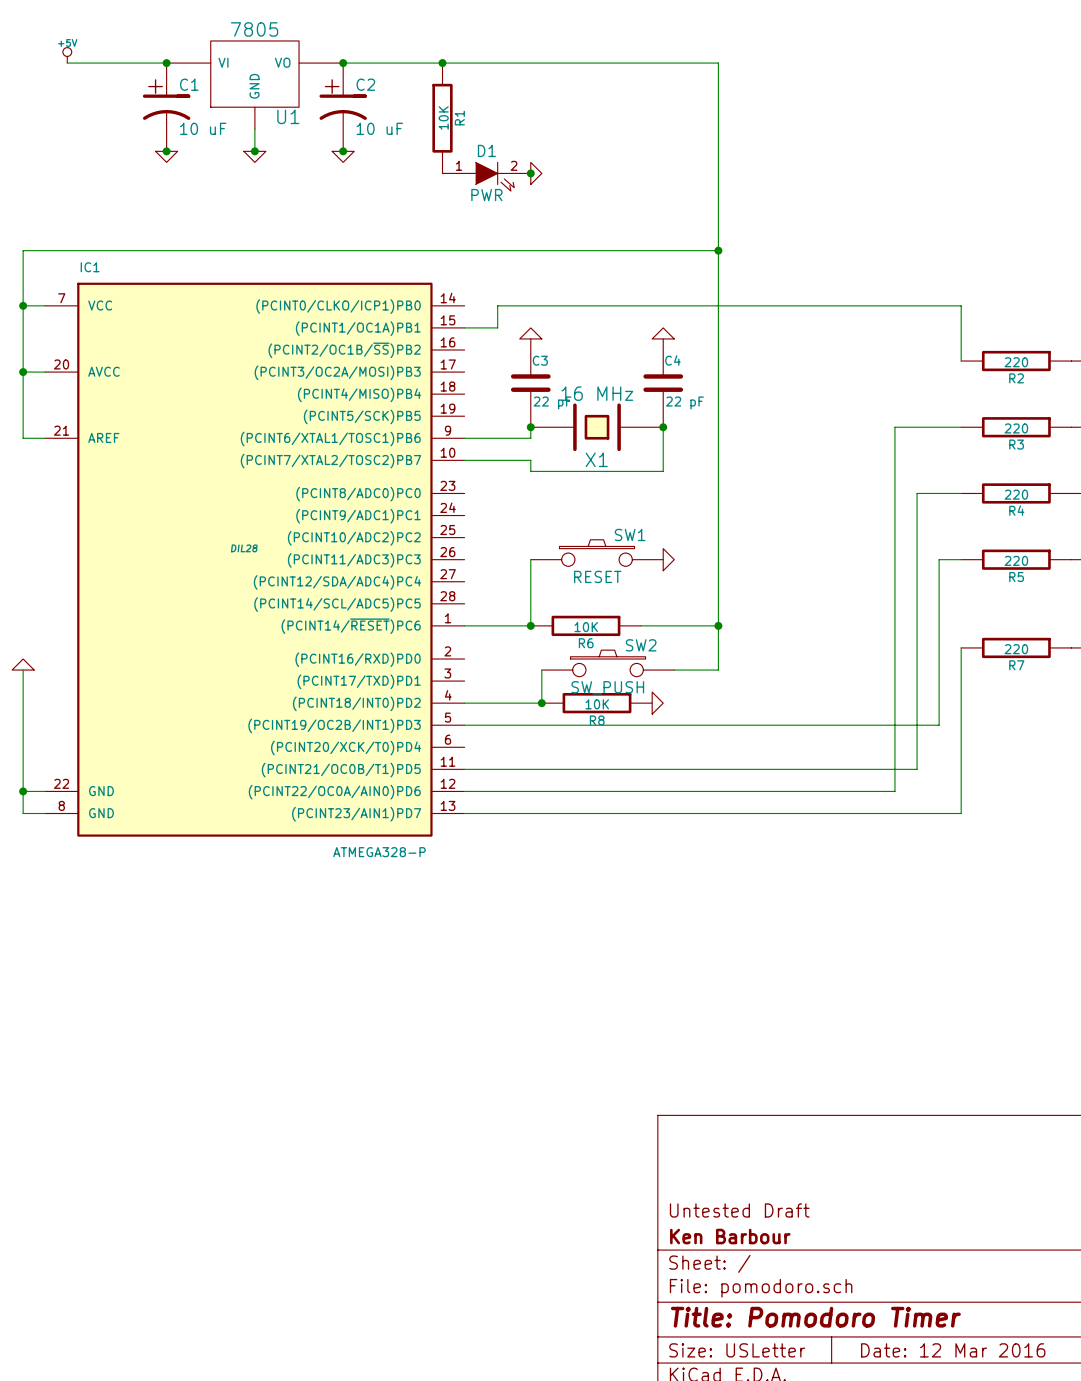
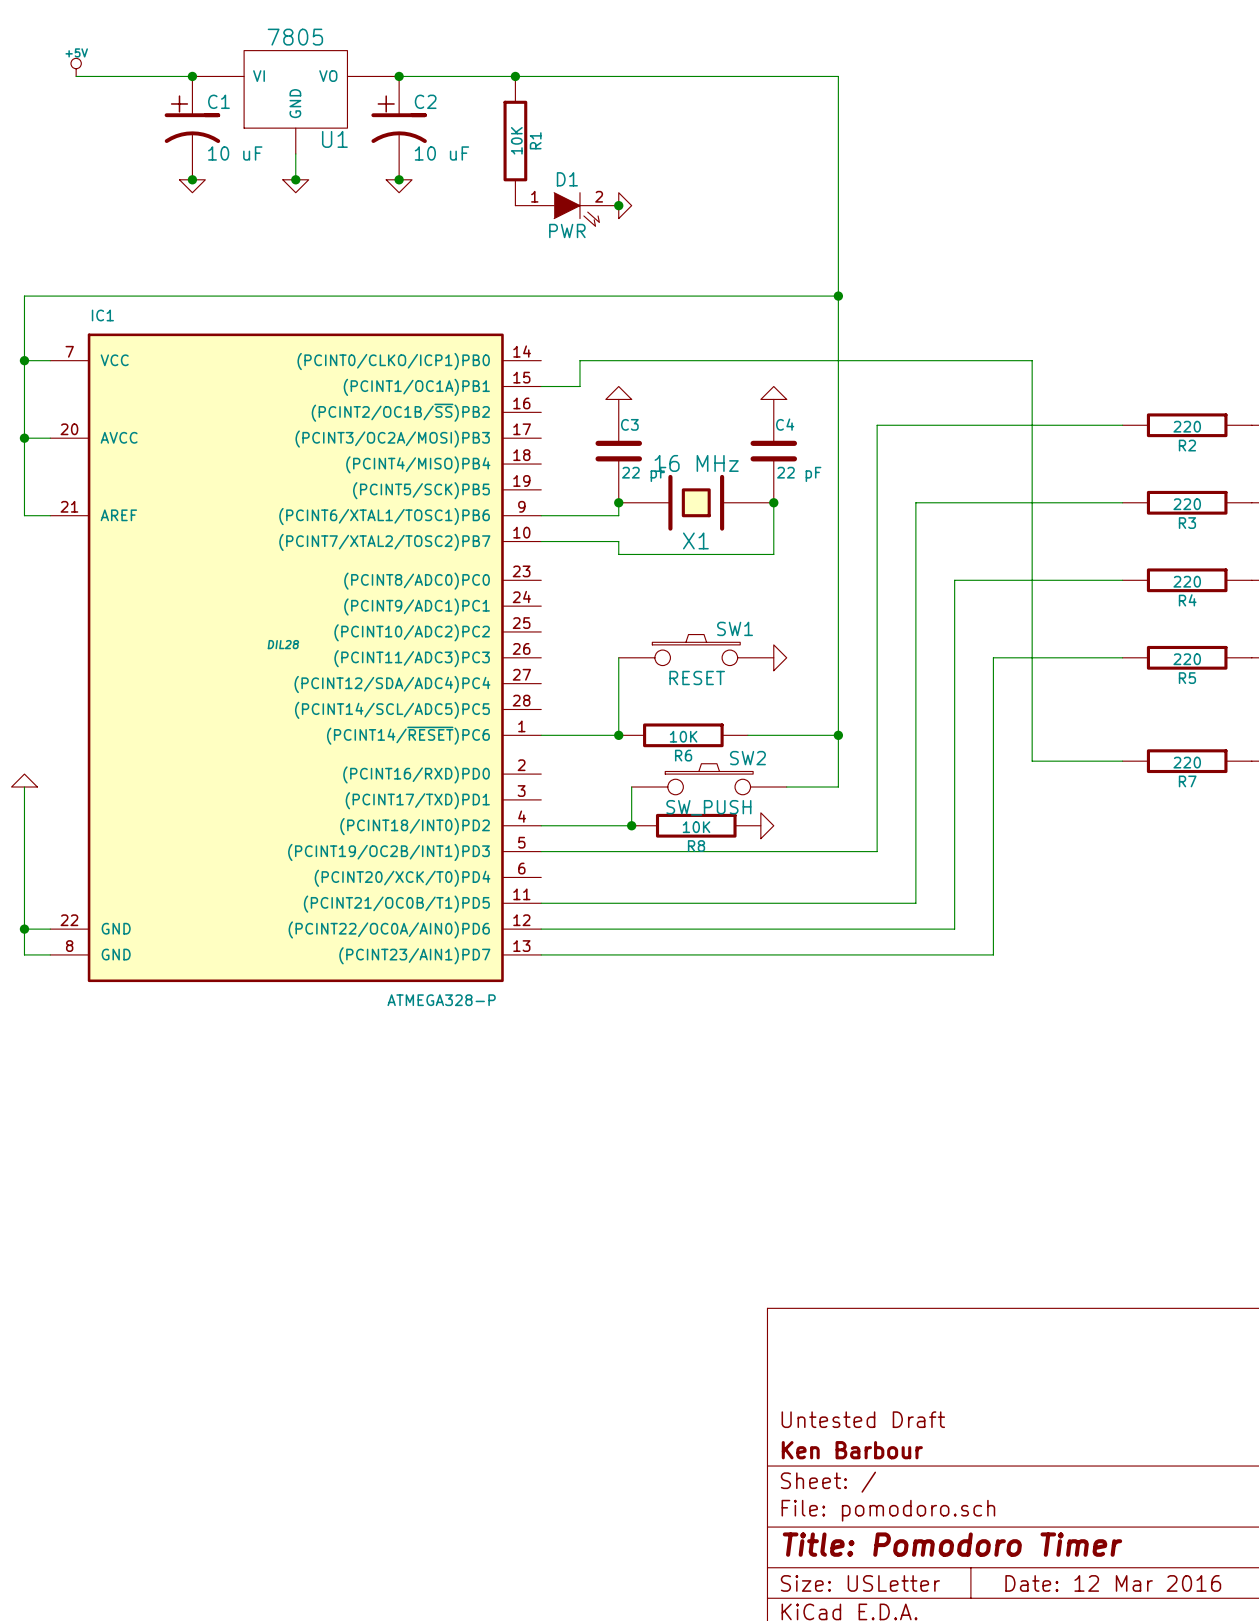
wire: (883, 305) (961, 305) (961, 361) -> (1032, 360) (1032, 761) (1122, 761)
wire: (894, 427) (894, 791) (817, 791) -> (1045, 502) (915, 502) (915, 903)
wire: (917, 493) (917, 769) (784, 769) -> (1070, 580) (954, 580) (954, 929)
wire: (939, 559) (939, 725) (751, 725) -> (1122, 425) (877, 425) (877, 851)
wire: (961, 647) (961, 813) (850, 813) -> (1096, 657) (993, 657) (993, 954)

